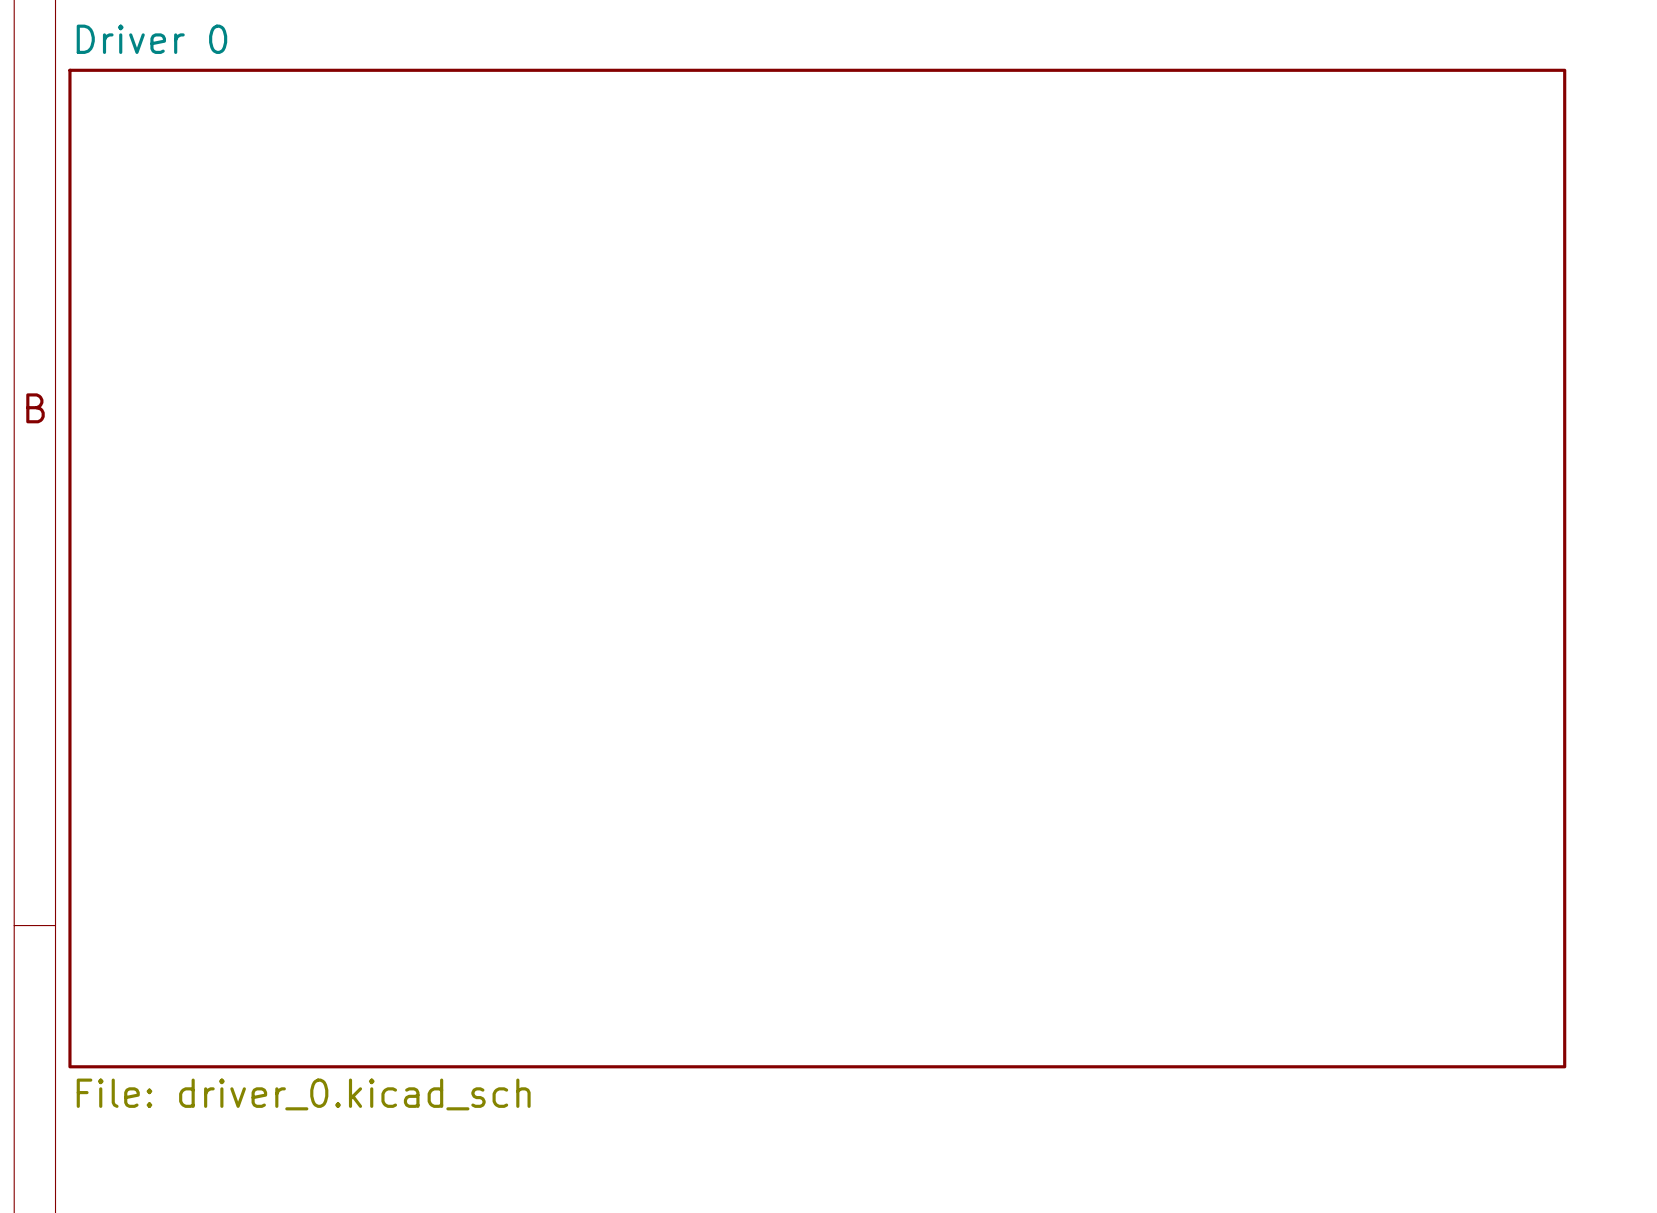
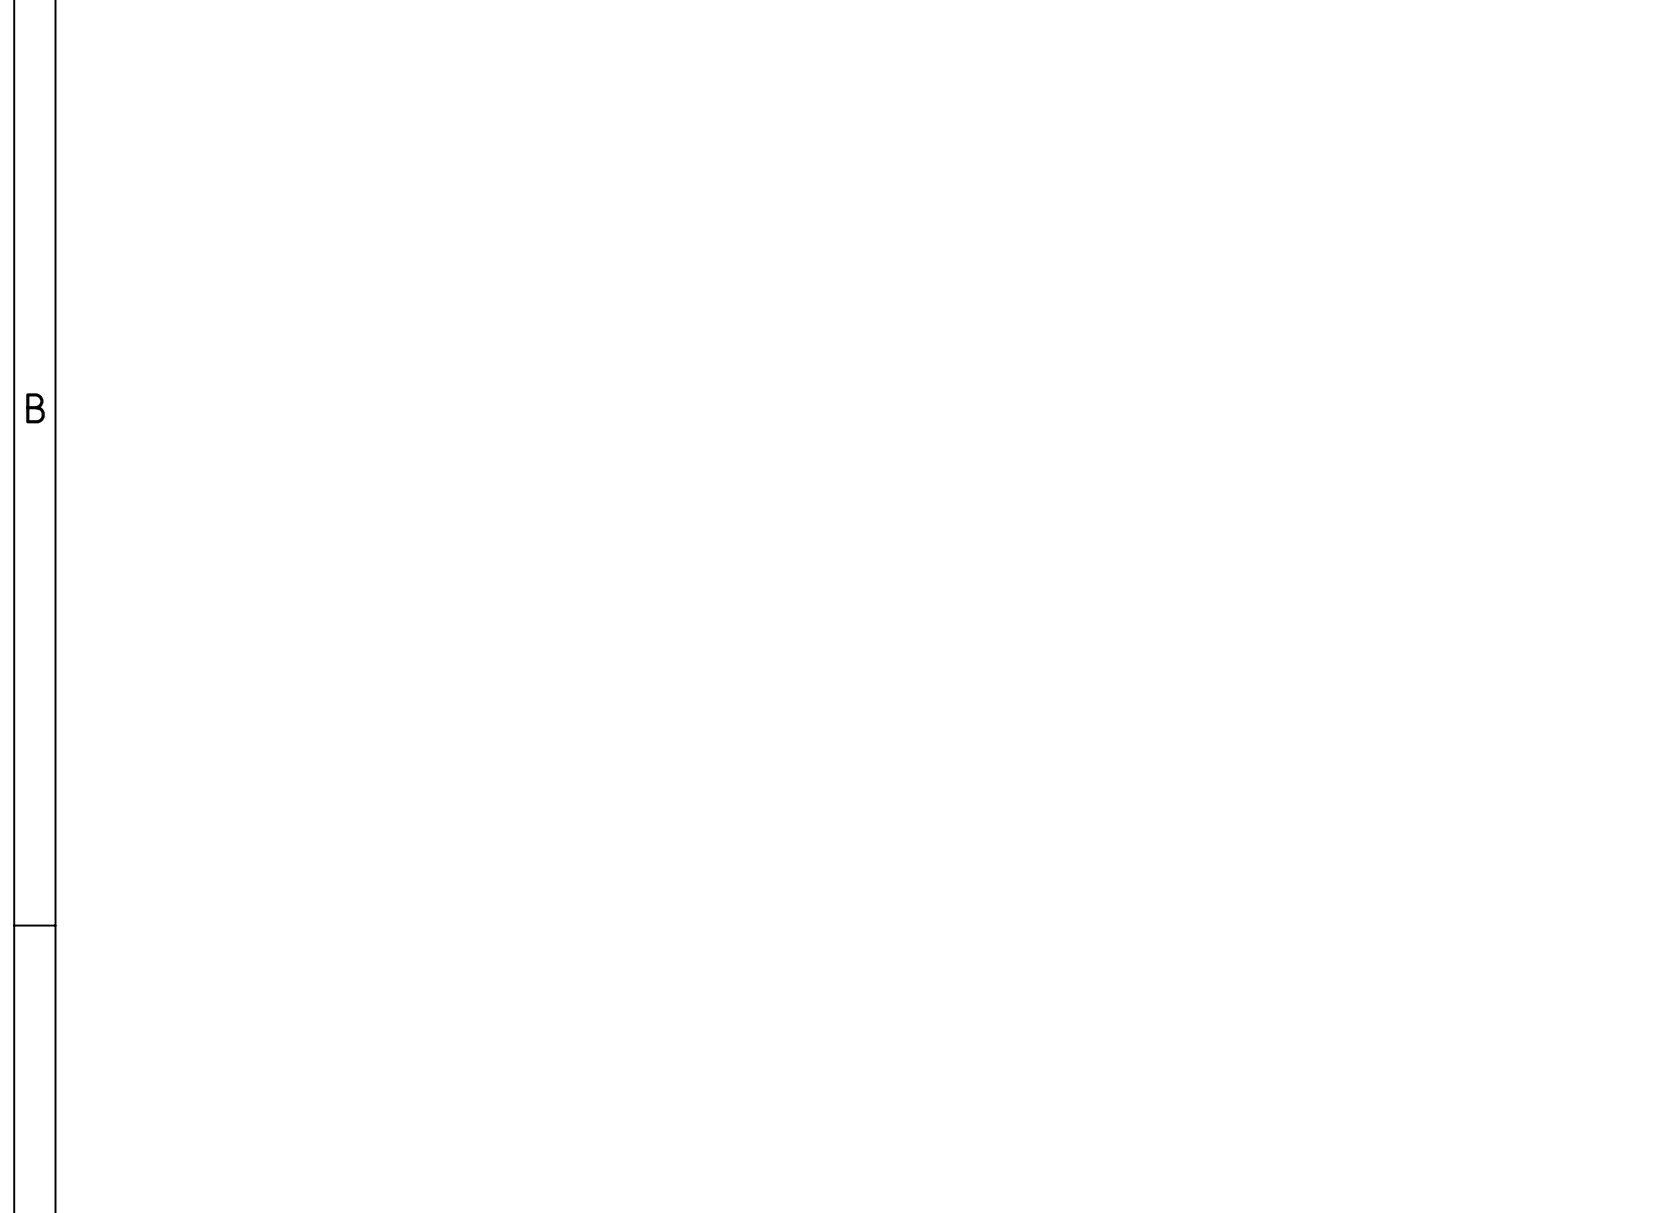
sheet Driver 0: File: driver_0.kicad_sch (817, 568) -> none

